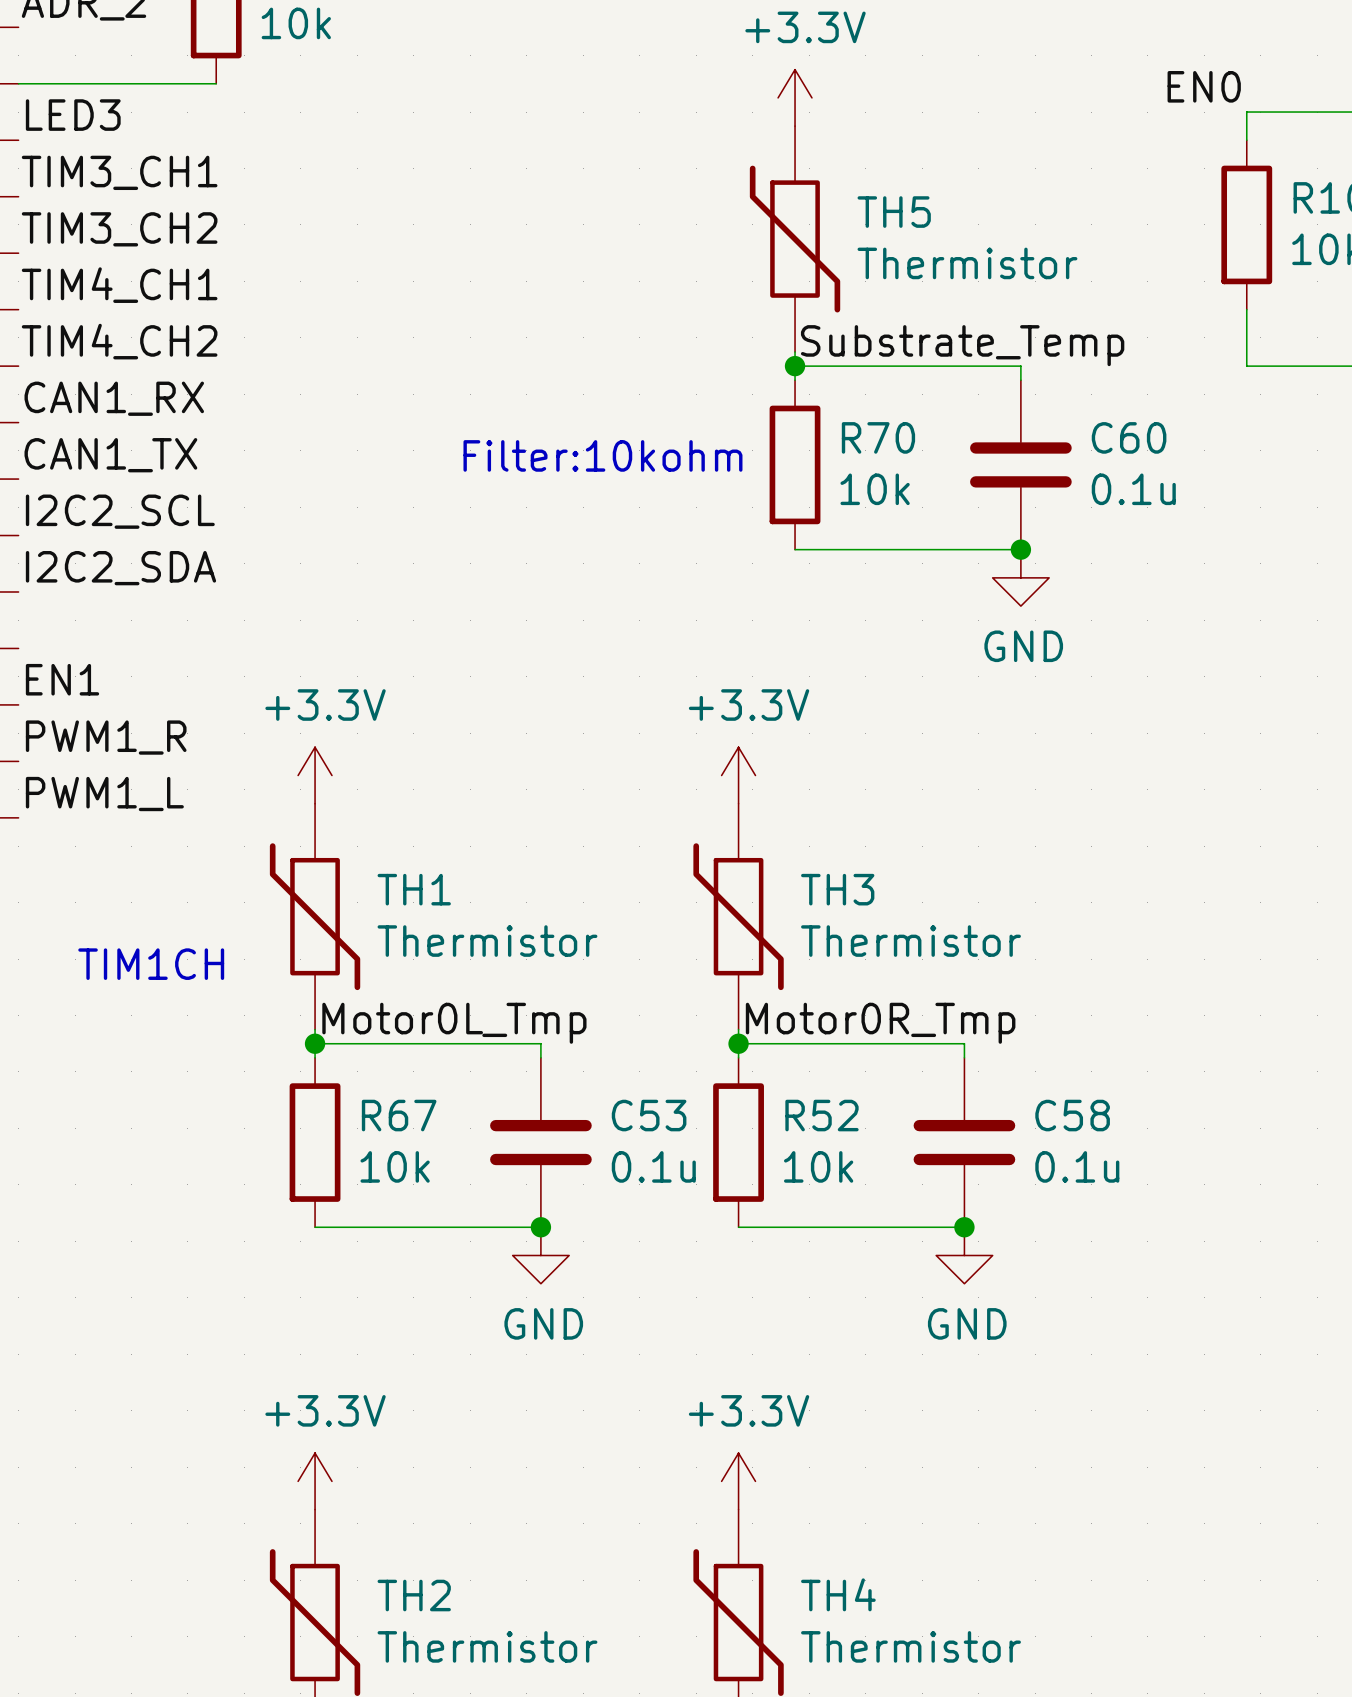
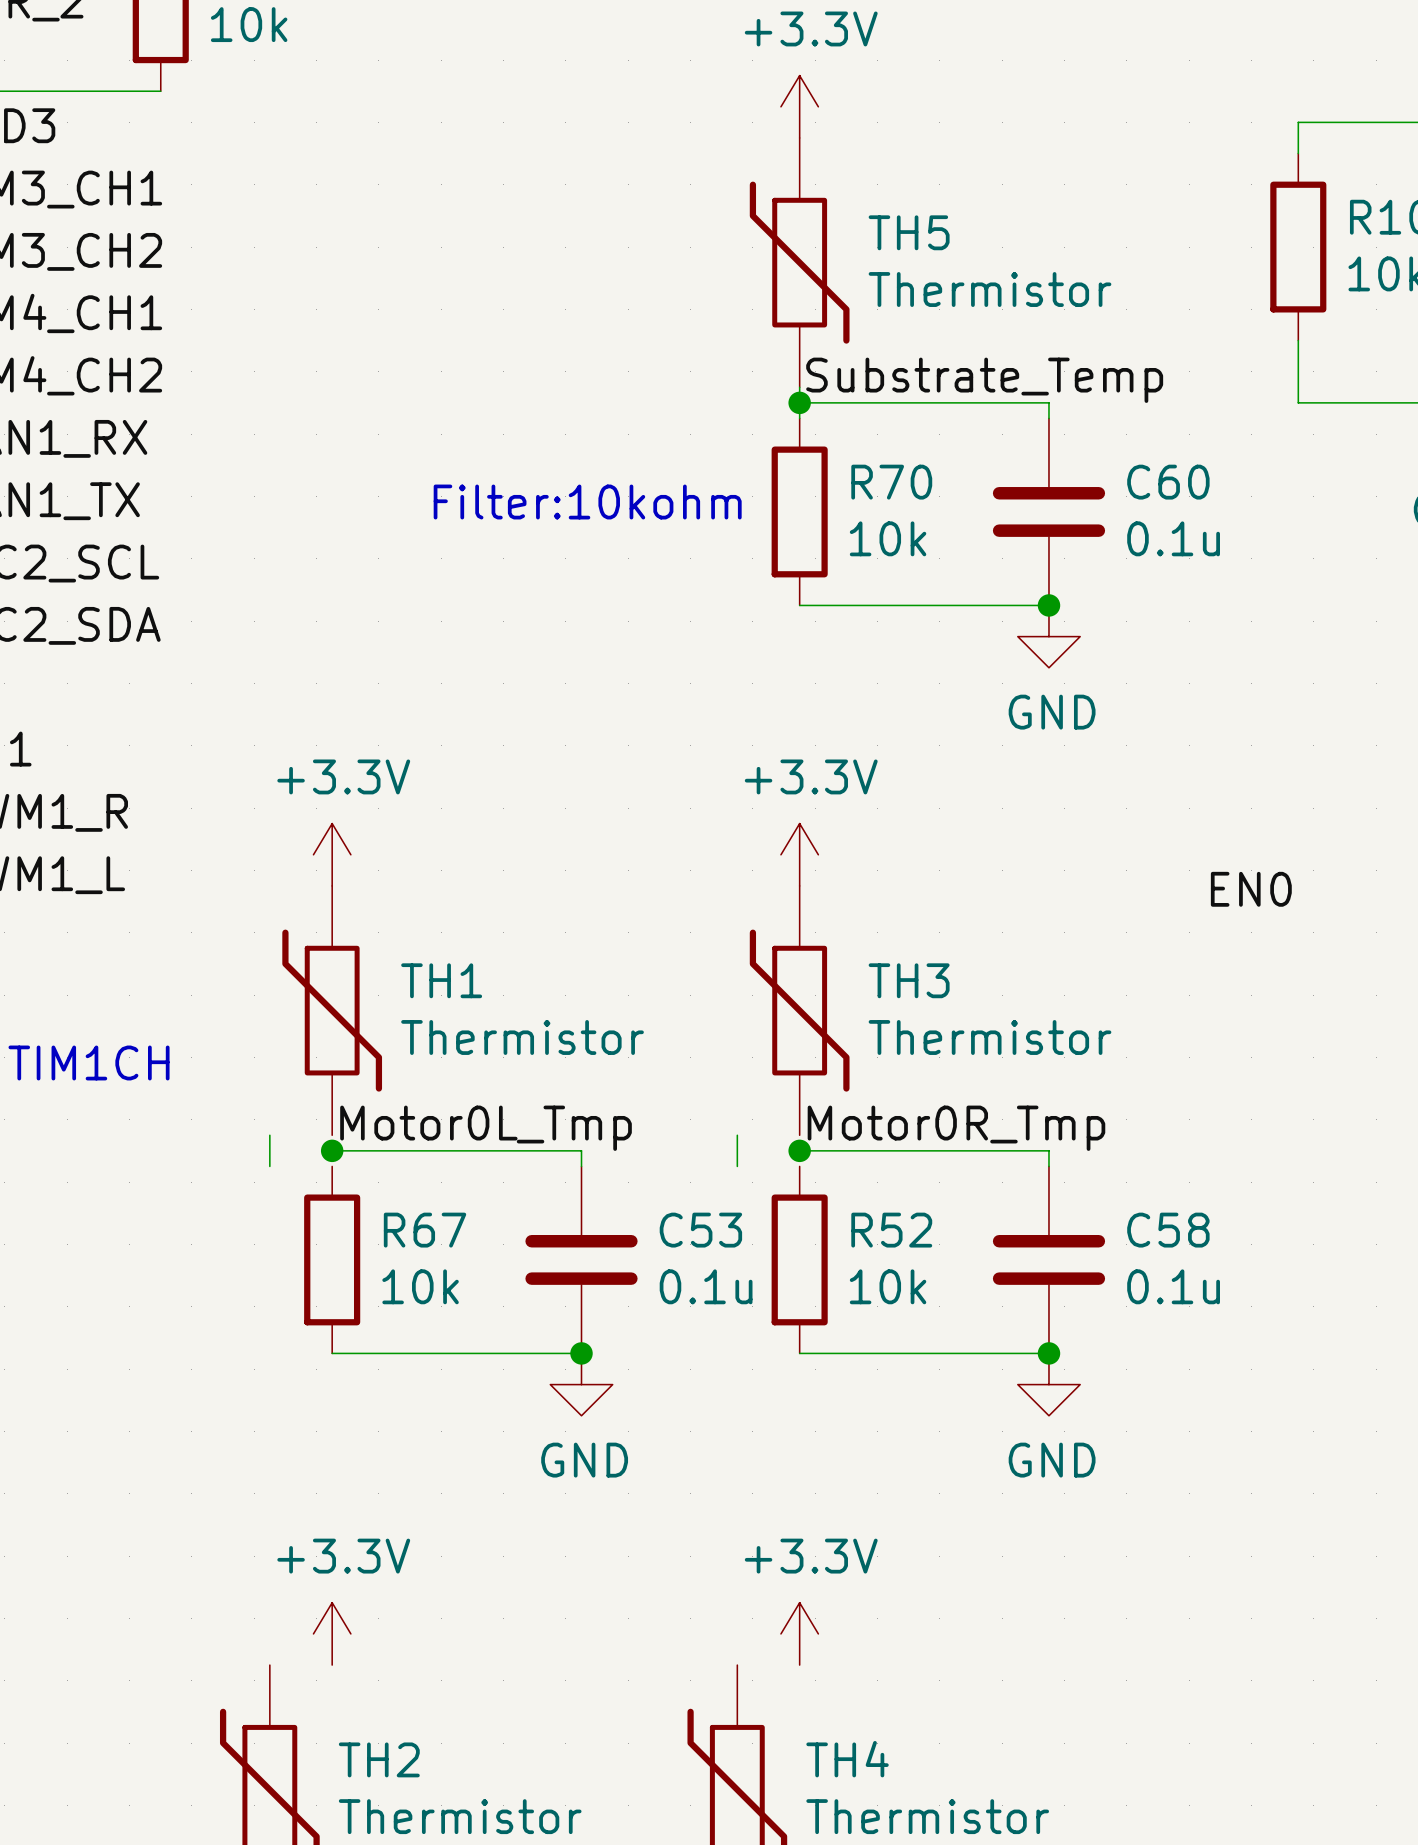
label: EN0 (1204, 86) -> none
power symbol position: +3.3V (315, 775) -> +3.3V (332, 854)
power symbol position: +3.3V (738, 775) -> +3.3V (799, 854)
label: none -> EN0 (1251, 889)
TH1 position: (315, 916) -> (332, 1010)
TH3 position: (738, 916) -> (799, 1010)
label position: Motor0L_Tmp (454, 1023) -> Motor0L_Tmp (486, 1128)
label position: Motor0R_Tmp (880, 1023) -> Motor0R_Tmp (956, 1128)
wire: (315, 1043) (371, 1043) -> none
junction position: (315, 1043) -> (332, 1150)
wire: (540, 1043) (540, 1057) -> (519, 1150) (581, 1150) (581, 1166)
wire: (738, 1043) (795, 1043) -> none
junction position: (738, 1043) -> (799, 1150)
wire: (964, 1043) (964, 1057) -> (986, 1150) (1048, 1150) (1048, 1166)
R67 position: (315, 1142) -> (332, 1259)
C53 position: (540, 1142) -> (581, 1259)
R52 position: (738, 1142) -> (799, 1259)
C58 position: (964, 1142) -> (1048, 1259)
wire: (315, 1227) (371, 1227) -> (519, 1353) (581, 1353)
junction position: (540, 1227) -> (581, 1353)
wire: (738, 1227) (795, 1227) -> (986, 1353) (1048, 1353)
junction position: (964, 1227) -> (1048, 1353)
power symbol position: GND (540, 1255) -> GND (581, 1384)
power symbol position: GND (964, 1255) -> GND (1048, 1384)
power symbol position: +3.3V (315, 1481) -> +3.3V (332, 1633)
power symbol position: +3.3V (738, 1481) -> +3.3V (799, 1633)

